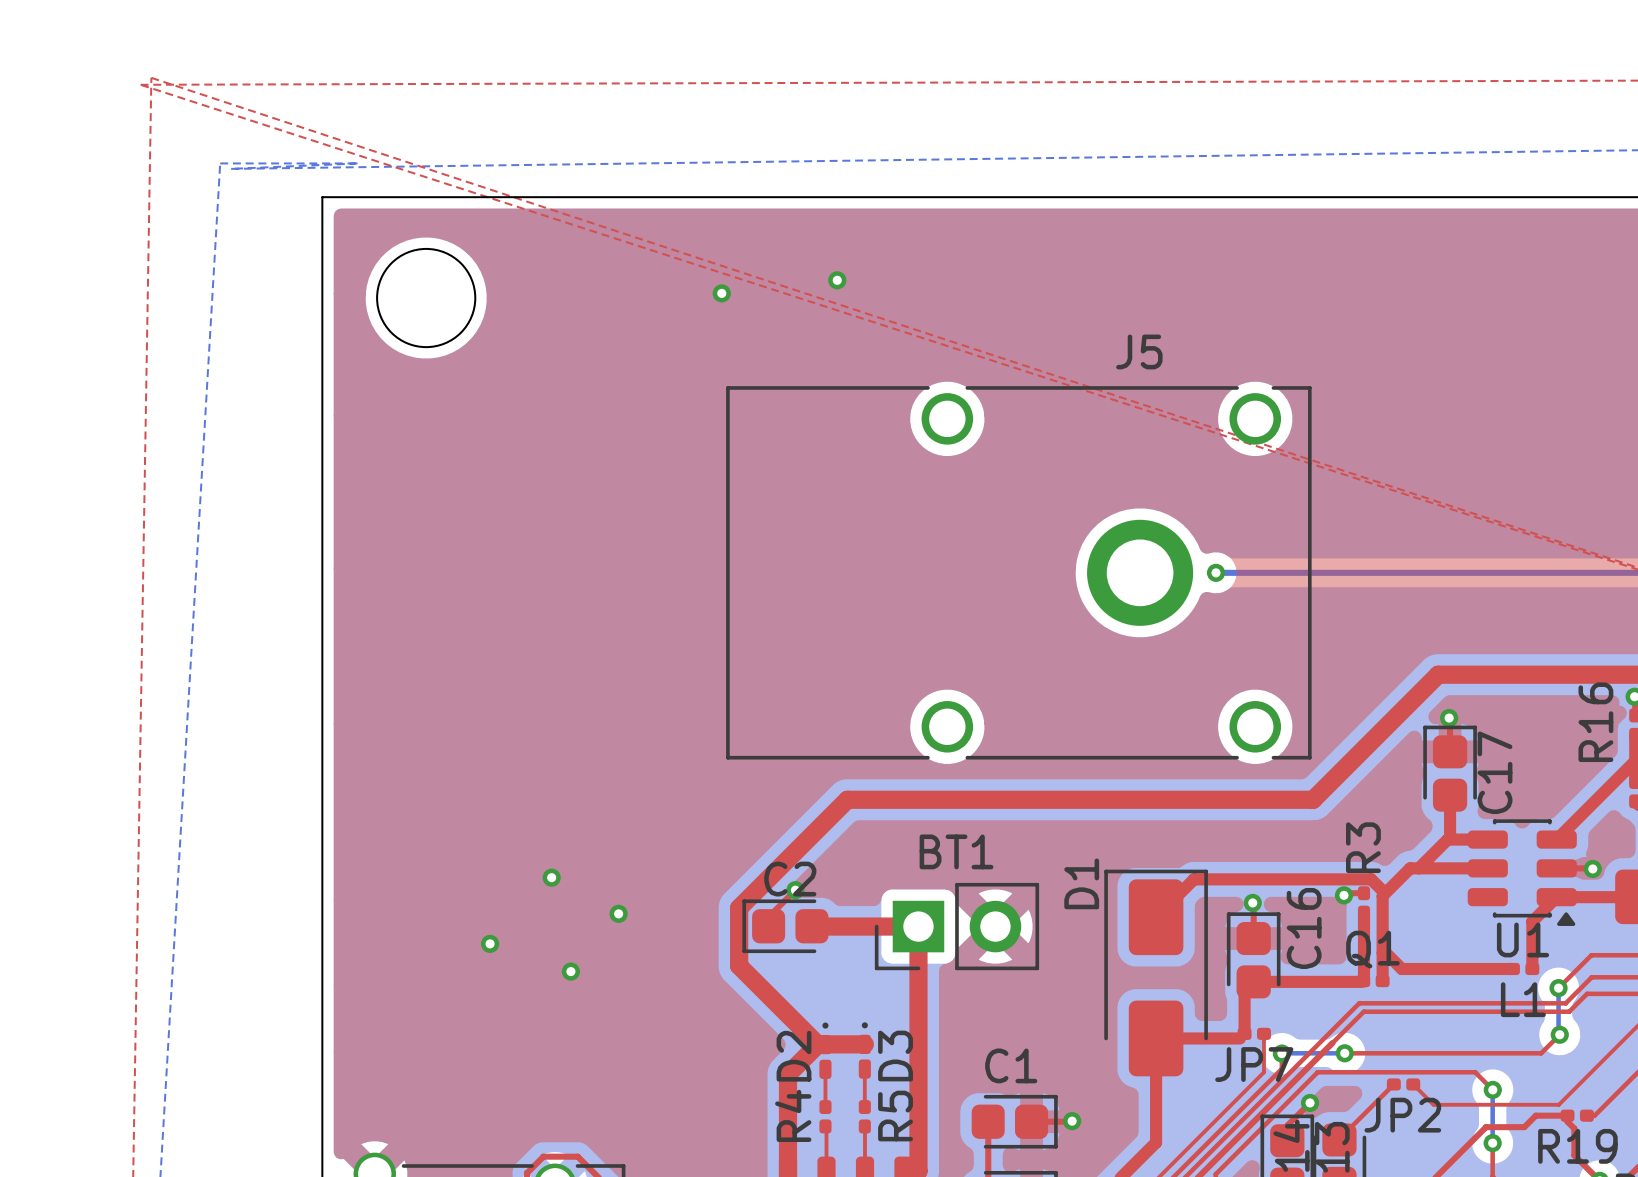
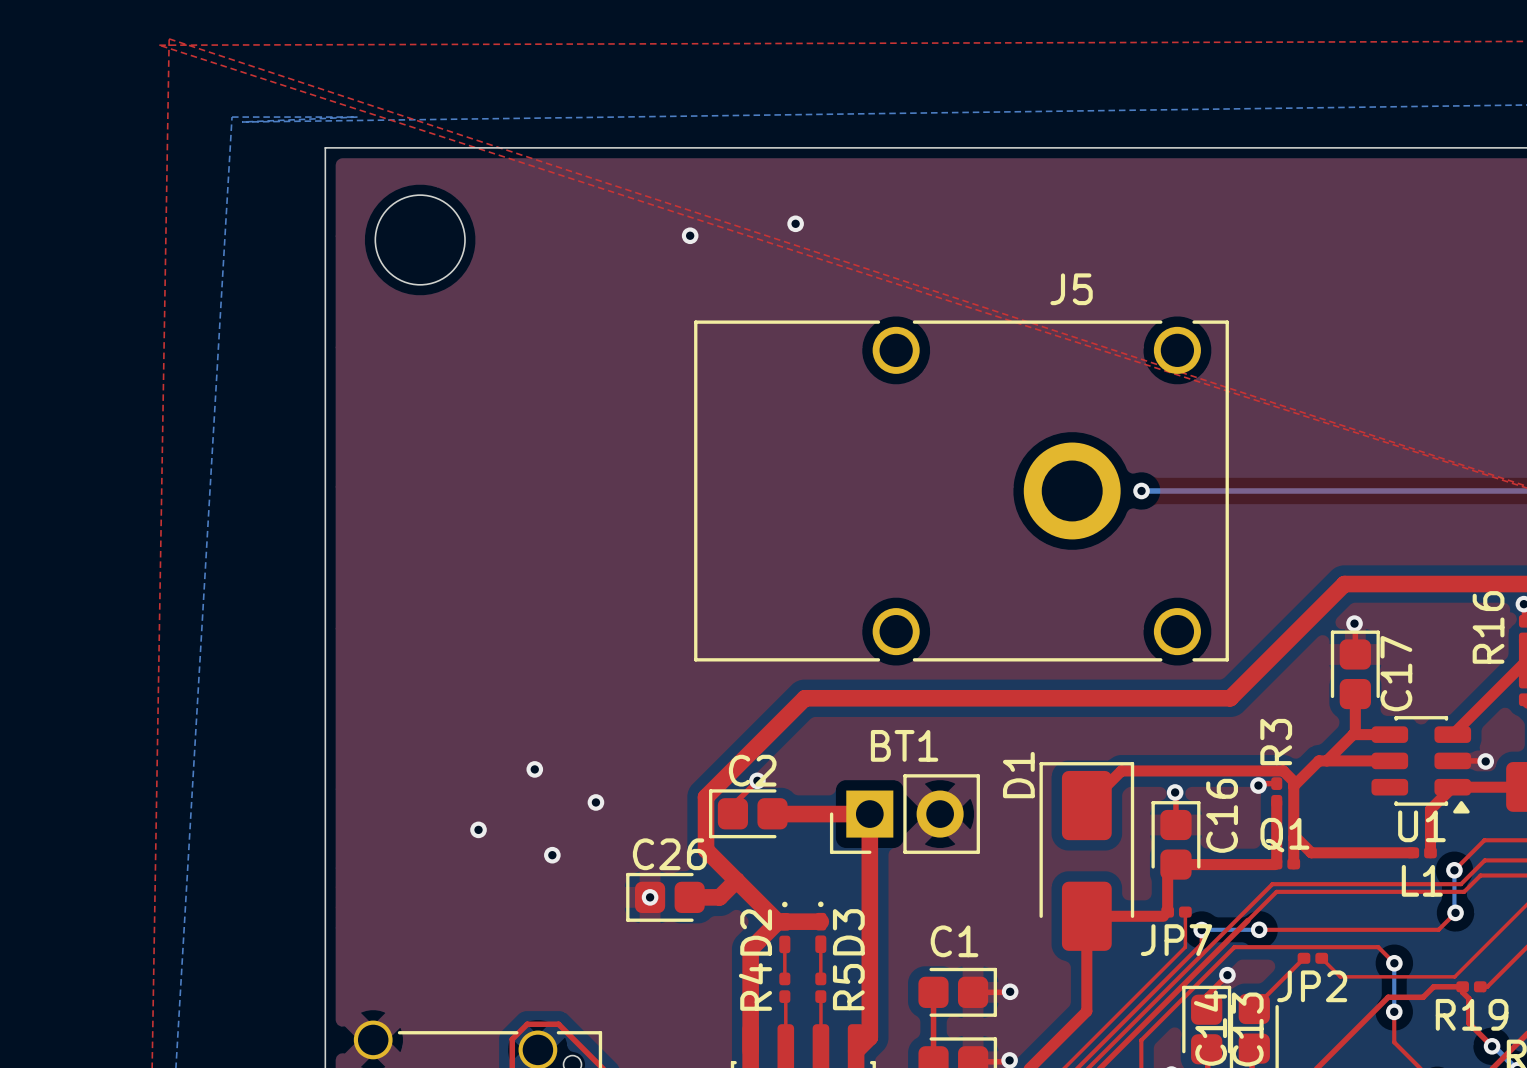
top track: none -> (736, 880) (719, 897) (689, 897)
via: none -> (650, 897)
C26: none -> (665, 897)

